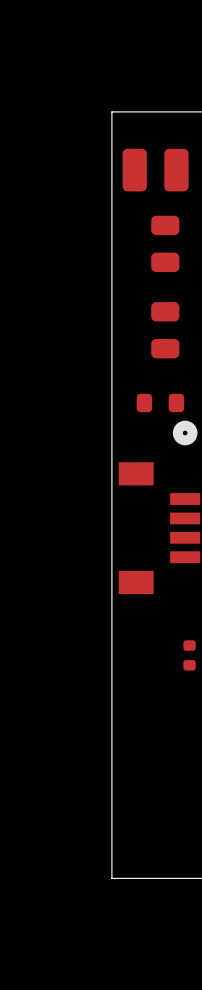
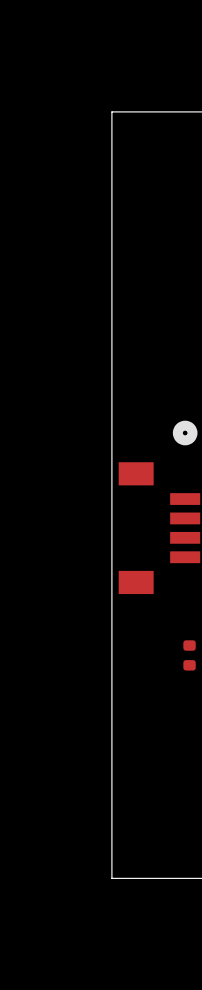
part: (155, 170) -> none
part: (165, 243) -> none
part: (165, 330) -> none
part: (160, 402) -> none

